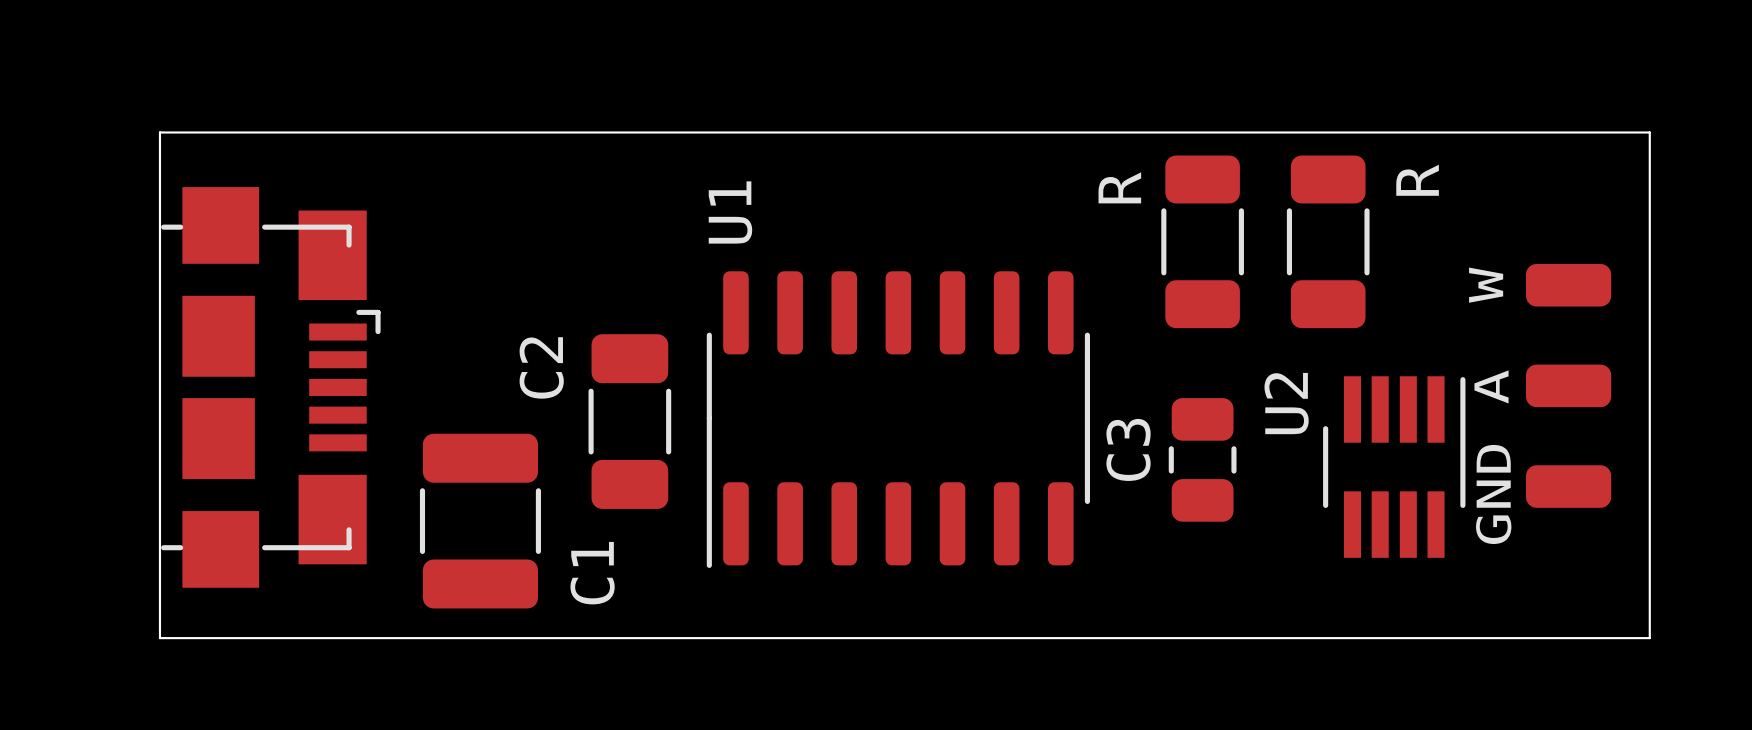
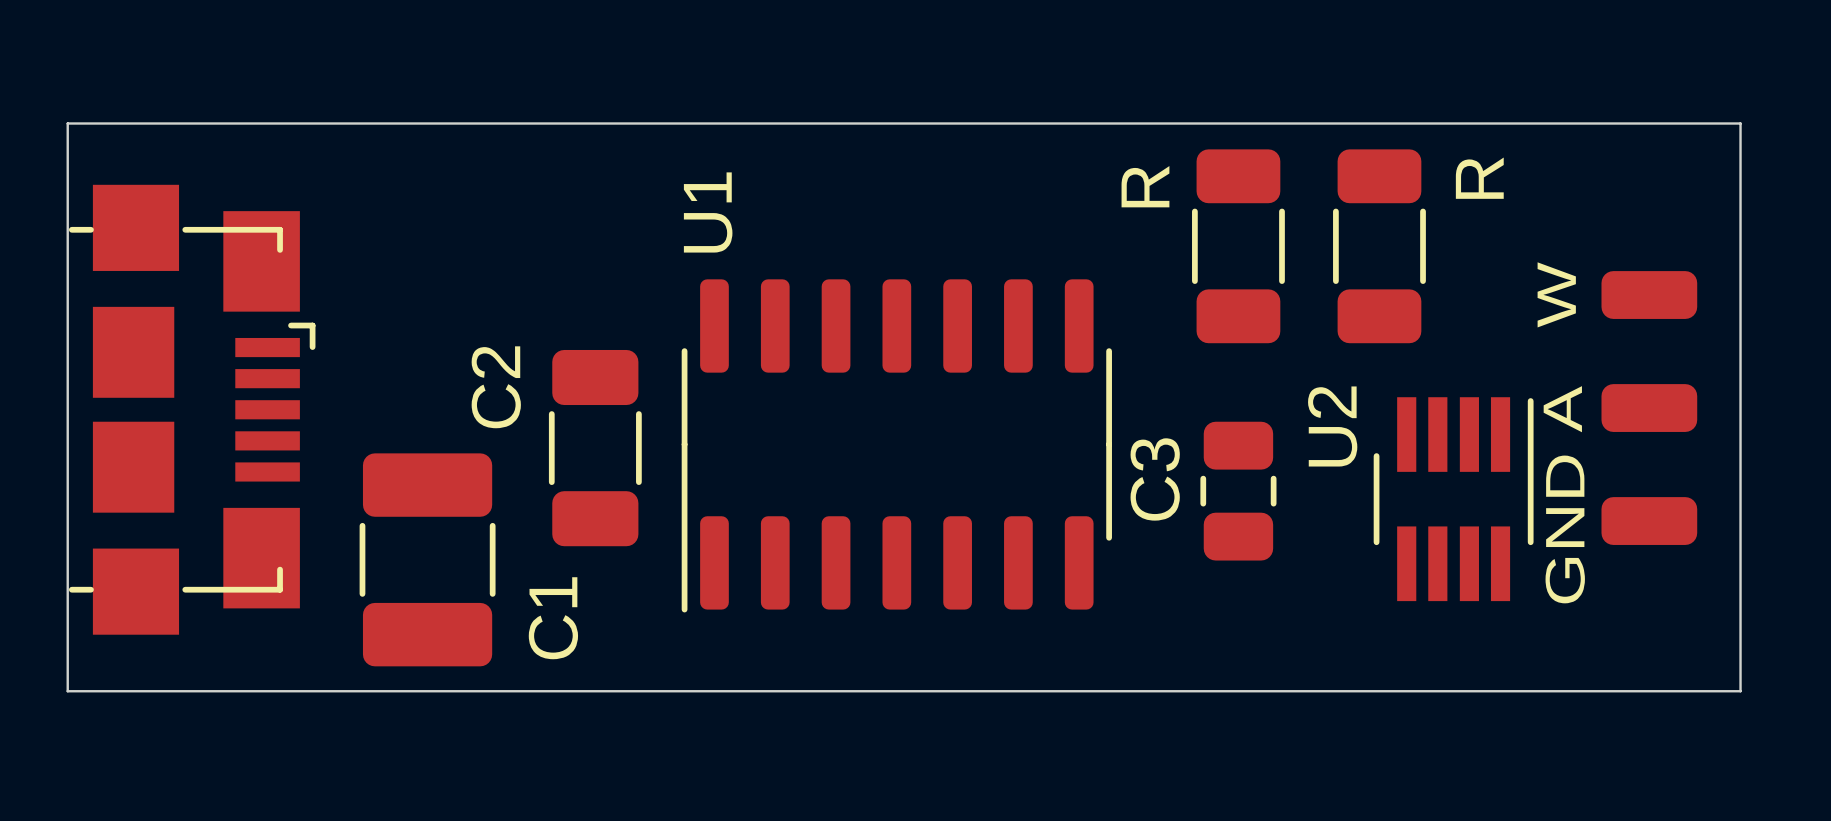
C1 footprint: [419, 433, 541, 609] -> [359, 453, 496, 667]

